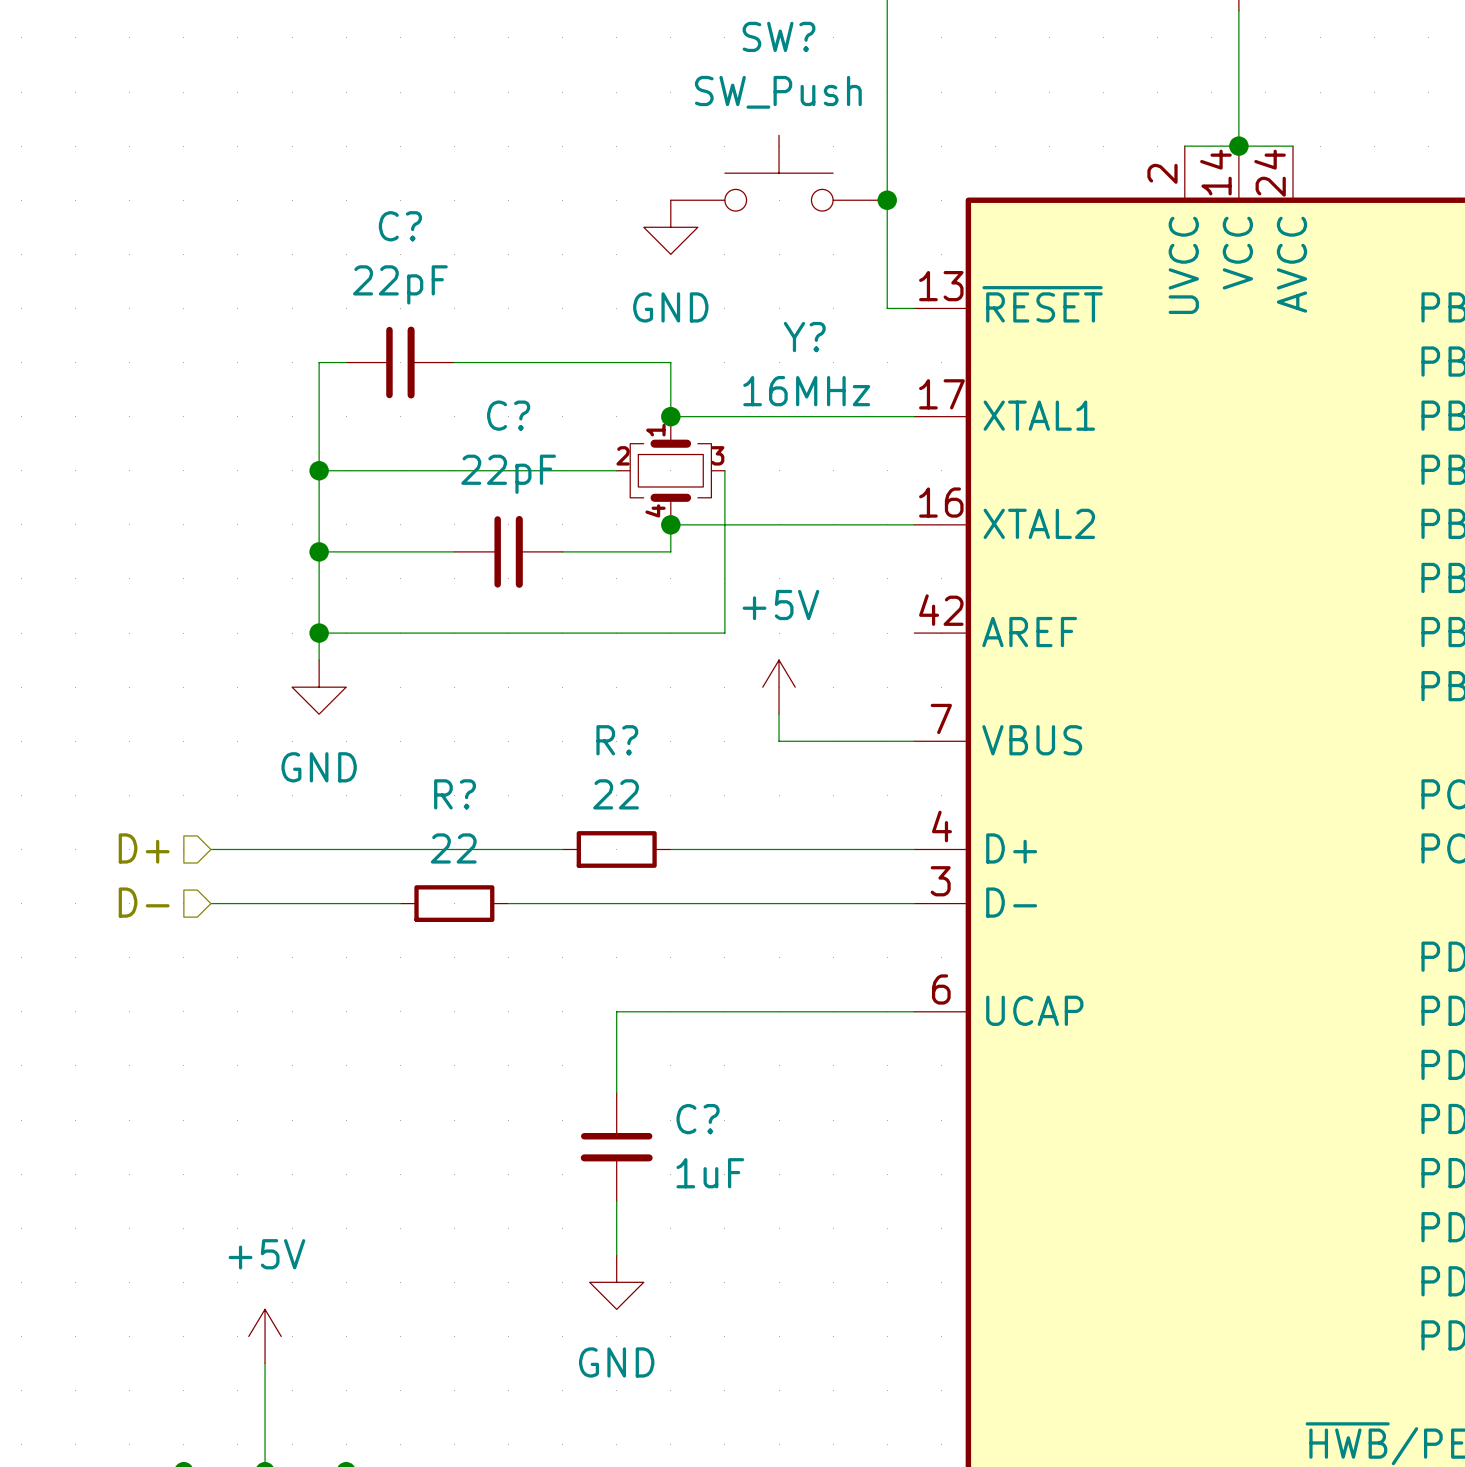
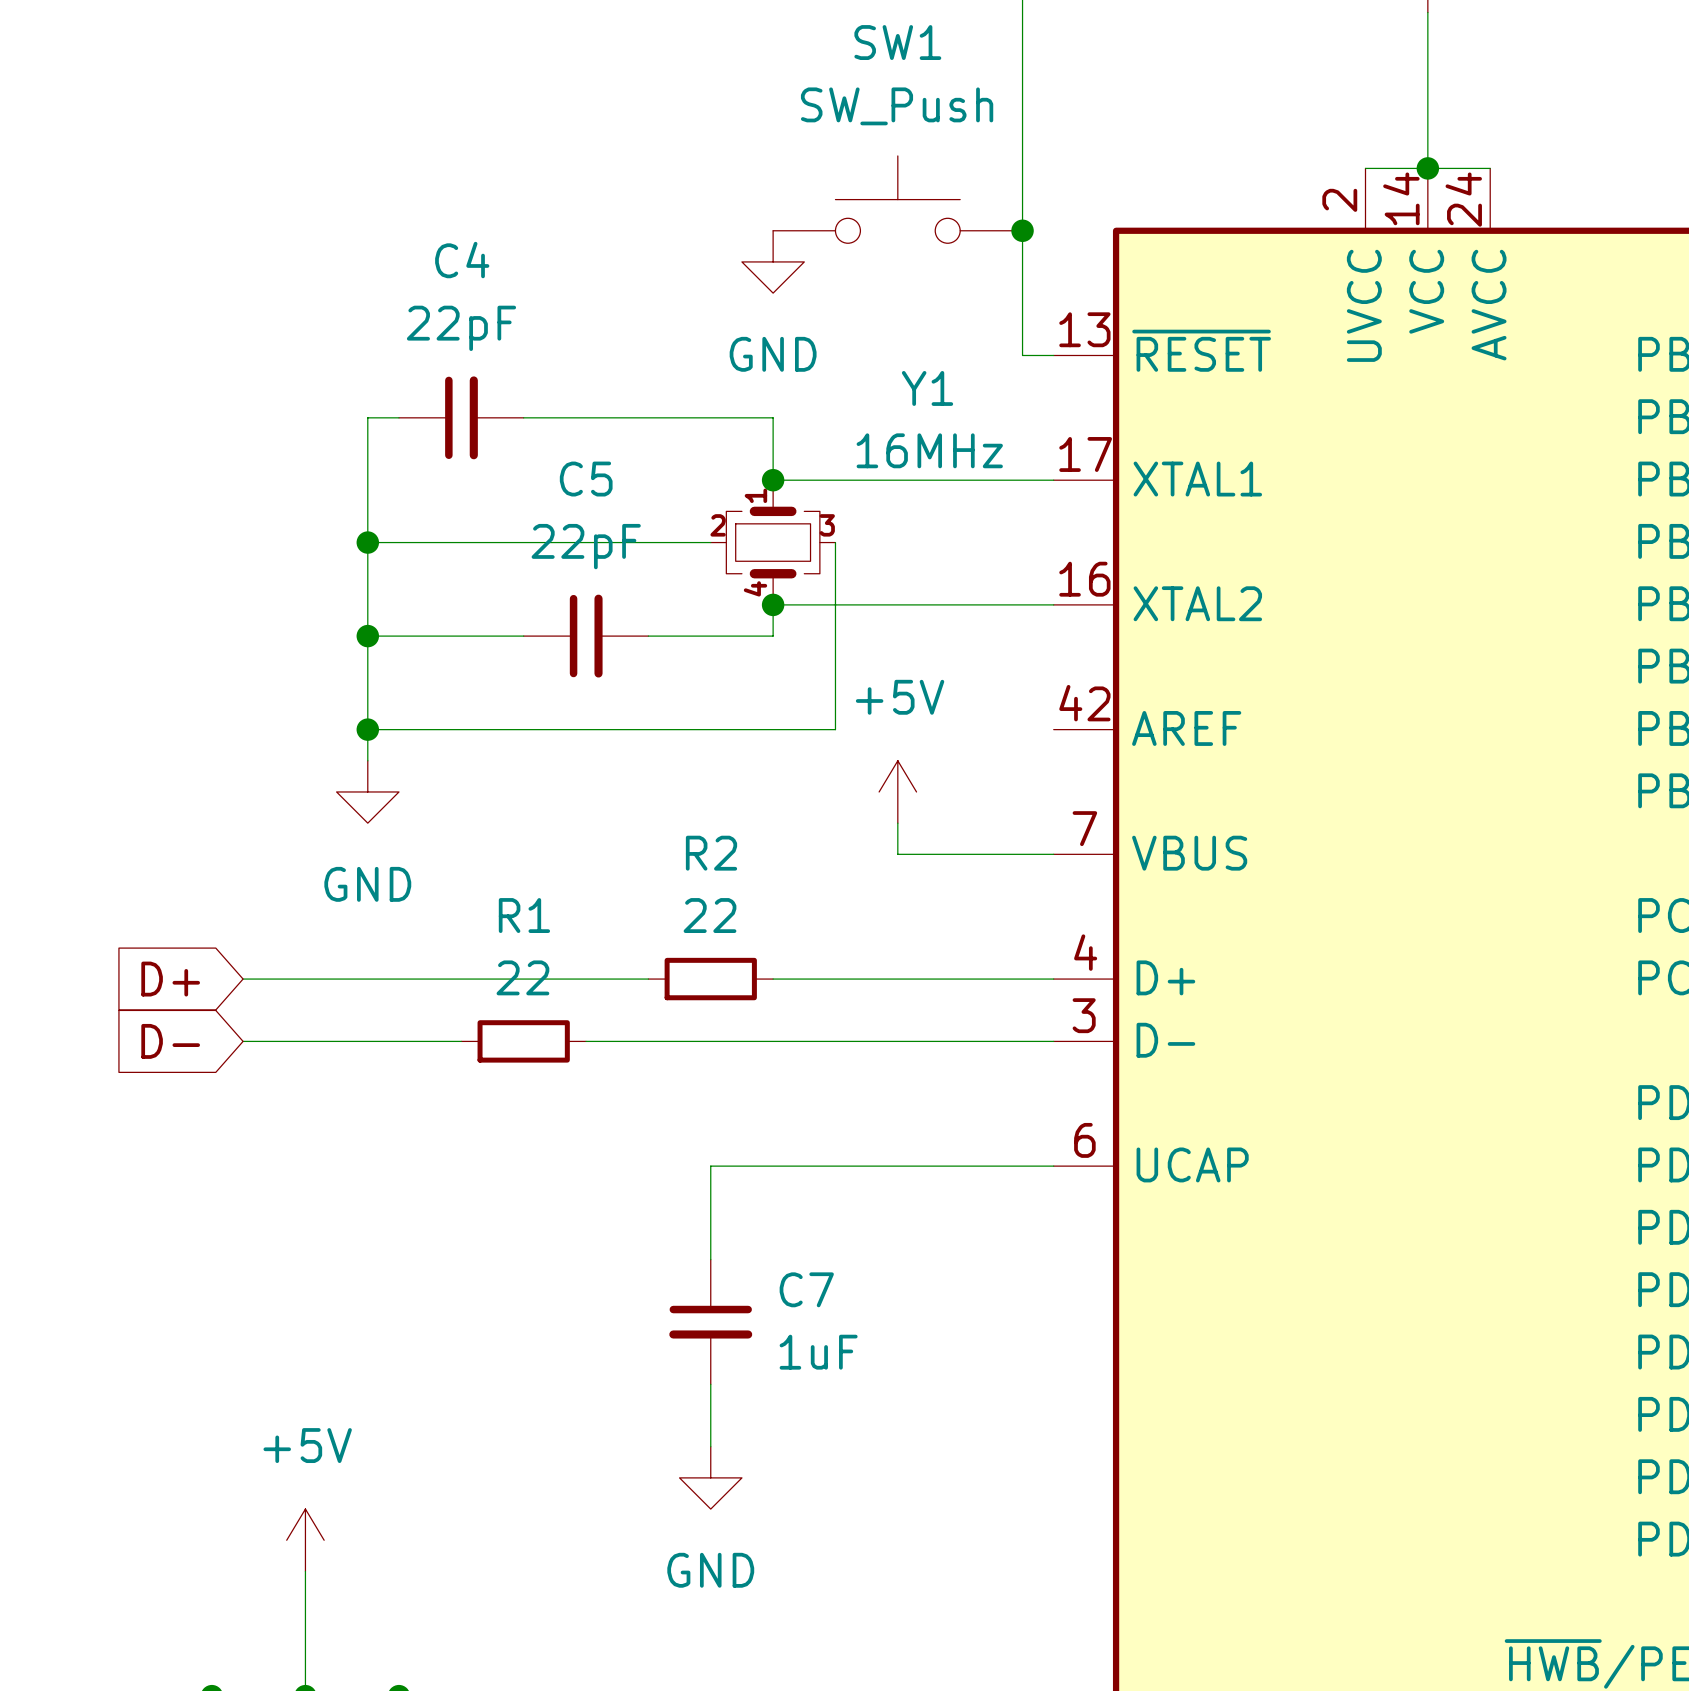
SW? name: SW? (779, 36) -> SW1 (897, 42)
C? name: C? (400, 226) -> C4 (462, 260)
Y? name: Y? (804, 337) -> Y1 (927, 388)
C? name: C? (508, 415) -> C5 (586, 479)
R? name: R? (617, 740) -> R2 (711, 853)
R? name: R? (455, 794) -> R1 (524, 915)
hierarchical label: D+ (144, 848) -> none
global label: none -> D+ (170, 979)
hierarchical label: D- (144, 902) -> none
global label: none -> D- (170, 1041)
C? name: C? (698, 1119) -> C7 (806, 1289)

